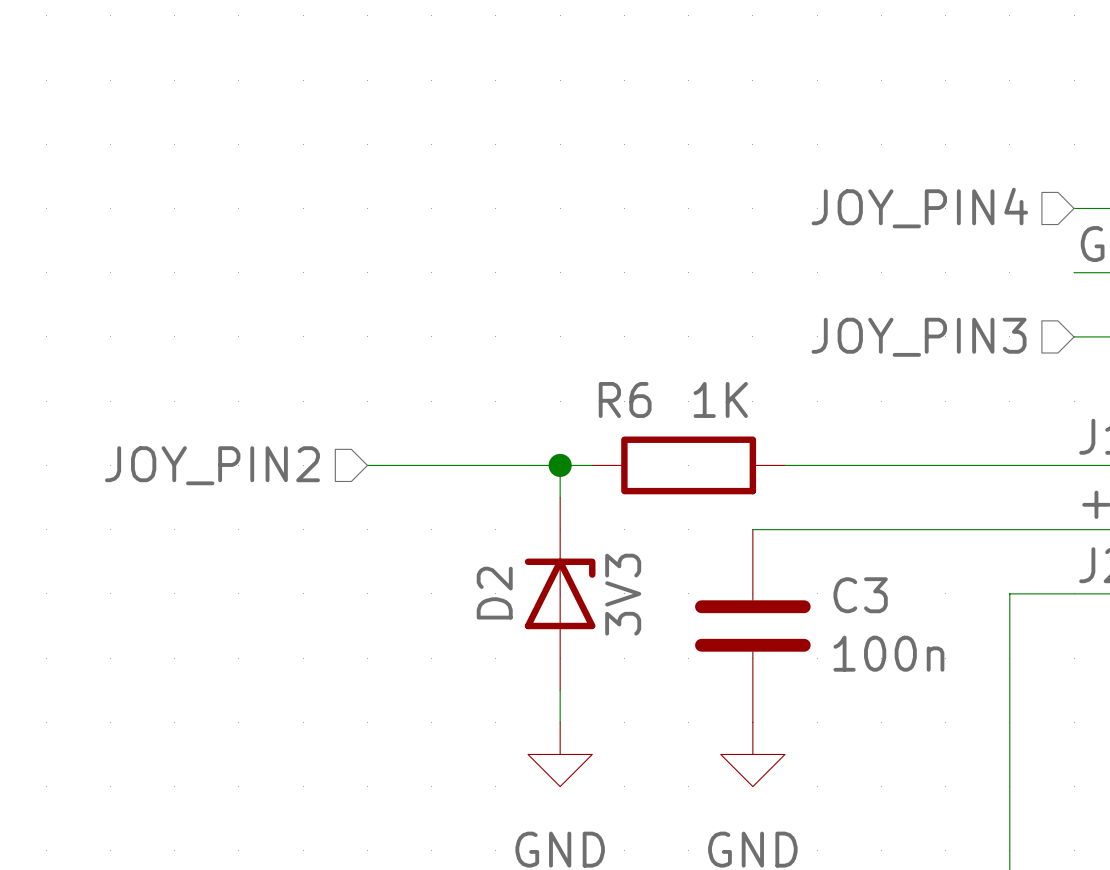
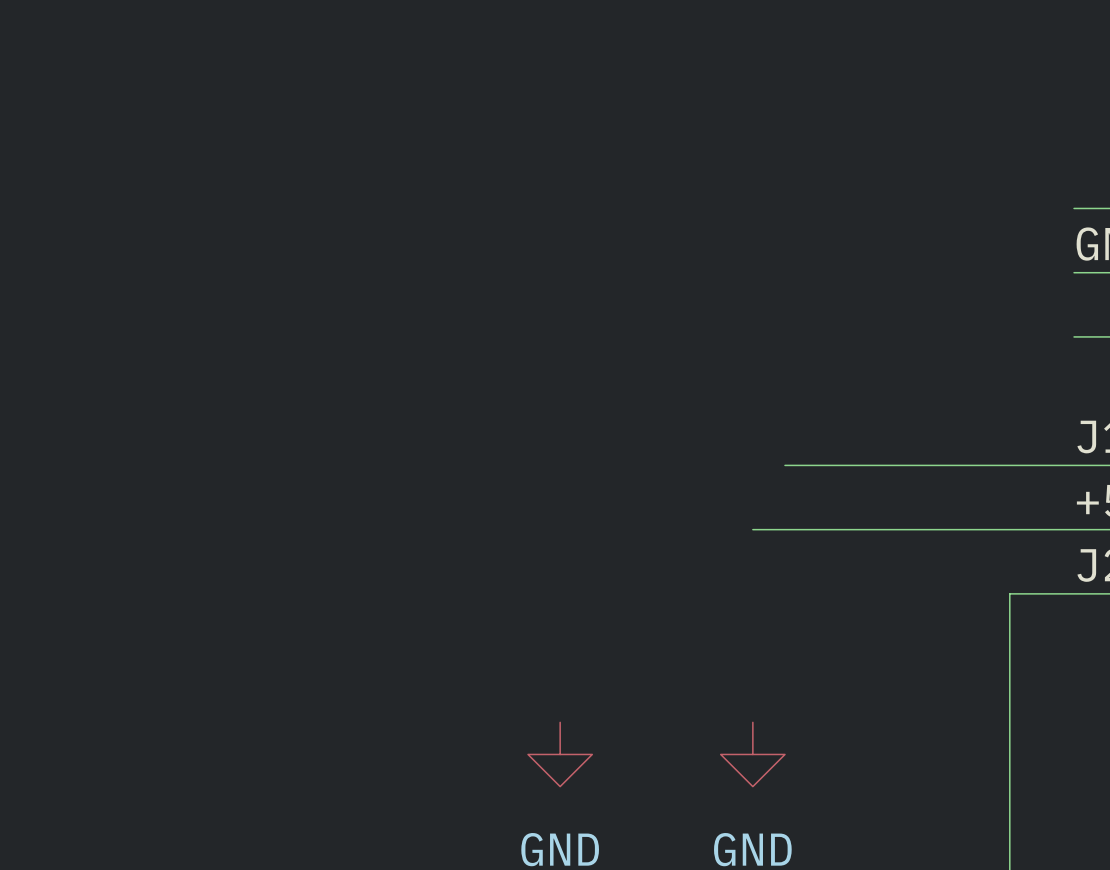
hierarchical label: JOY_PIN4 (919, 208) -> none
hierarchical label: JOY_PIN3 (919, 337) -> none
hierarchical label: JOY_PIN2 (212, 465) -> none
wire: (367, 465) (592, 465) -> none
wire: (560, 465) (560, 497) -> none
junction: (560, 465) -> none
R6: 1K (688, 465) -> none
D2: 3V3 (560, 593) -> none
C3: 100n (752, 626) -> none
wire: (560, 690) (560, 722) -> none

